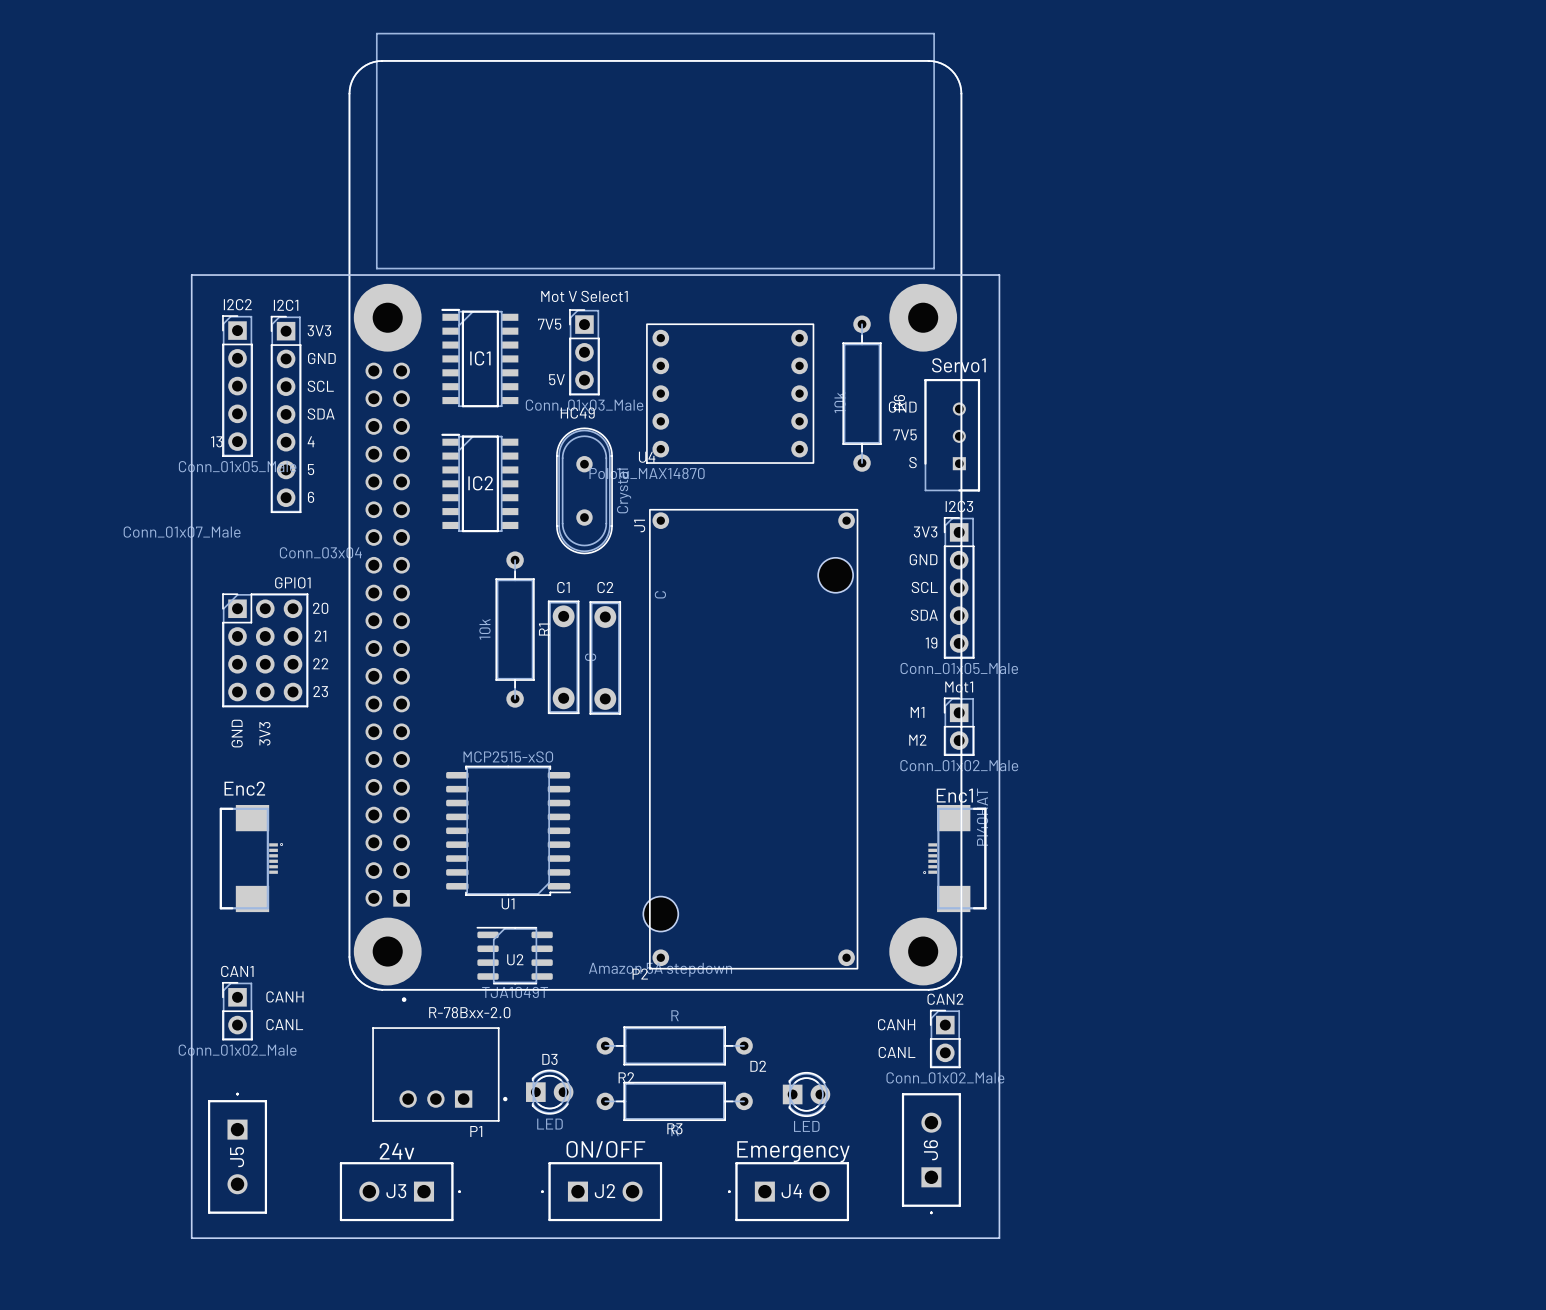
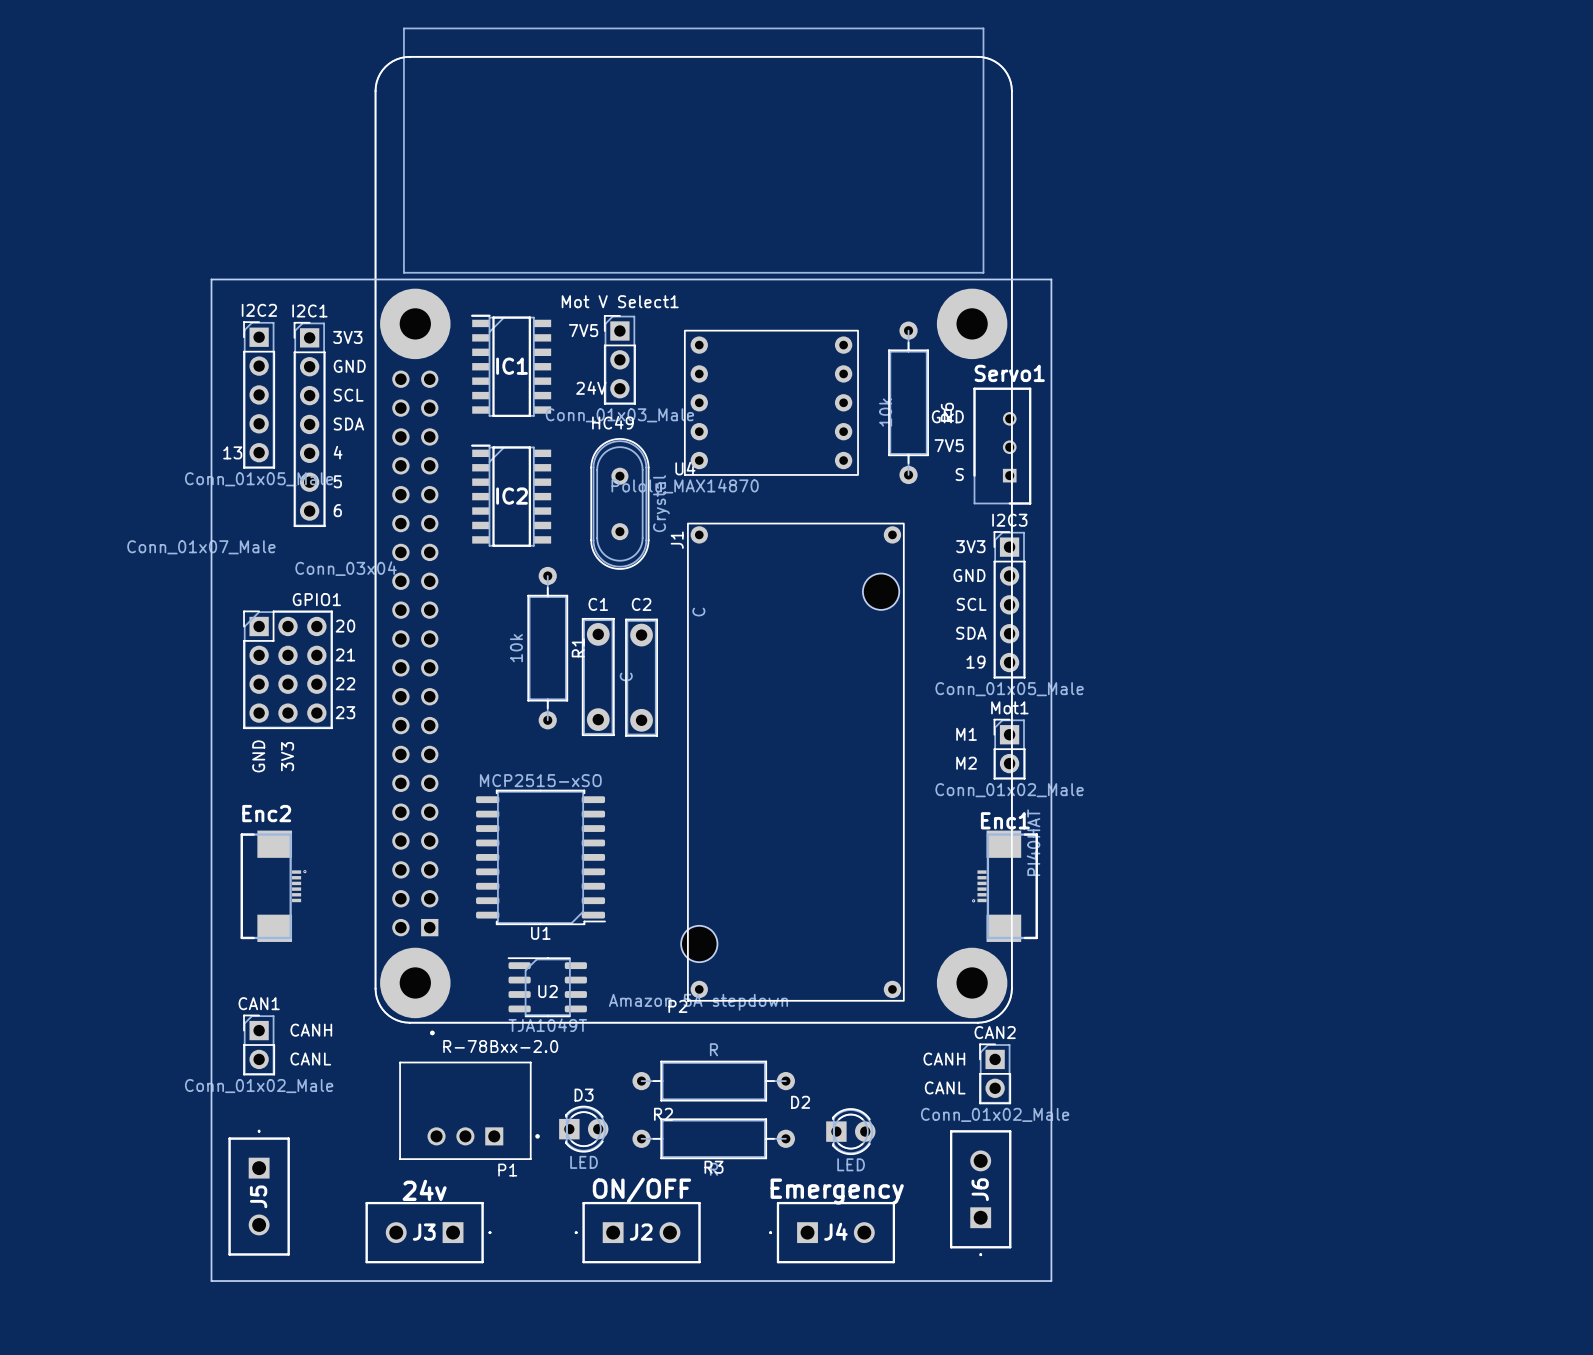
text: 5V (556, 379) -> 24V (591, 388)

